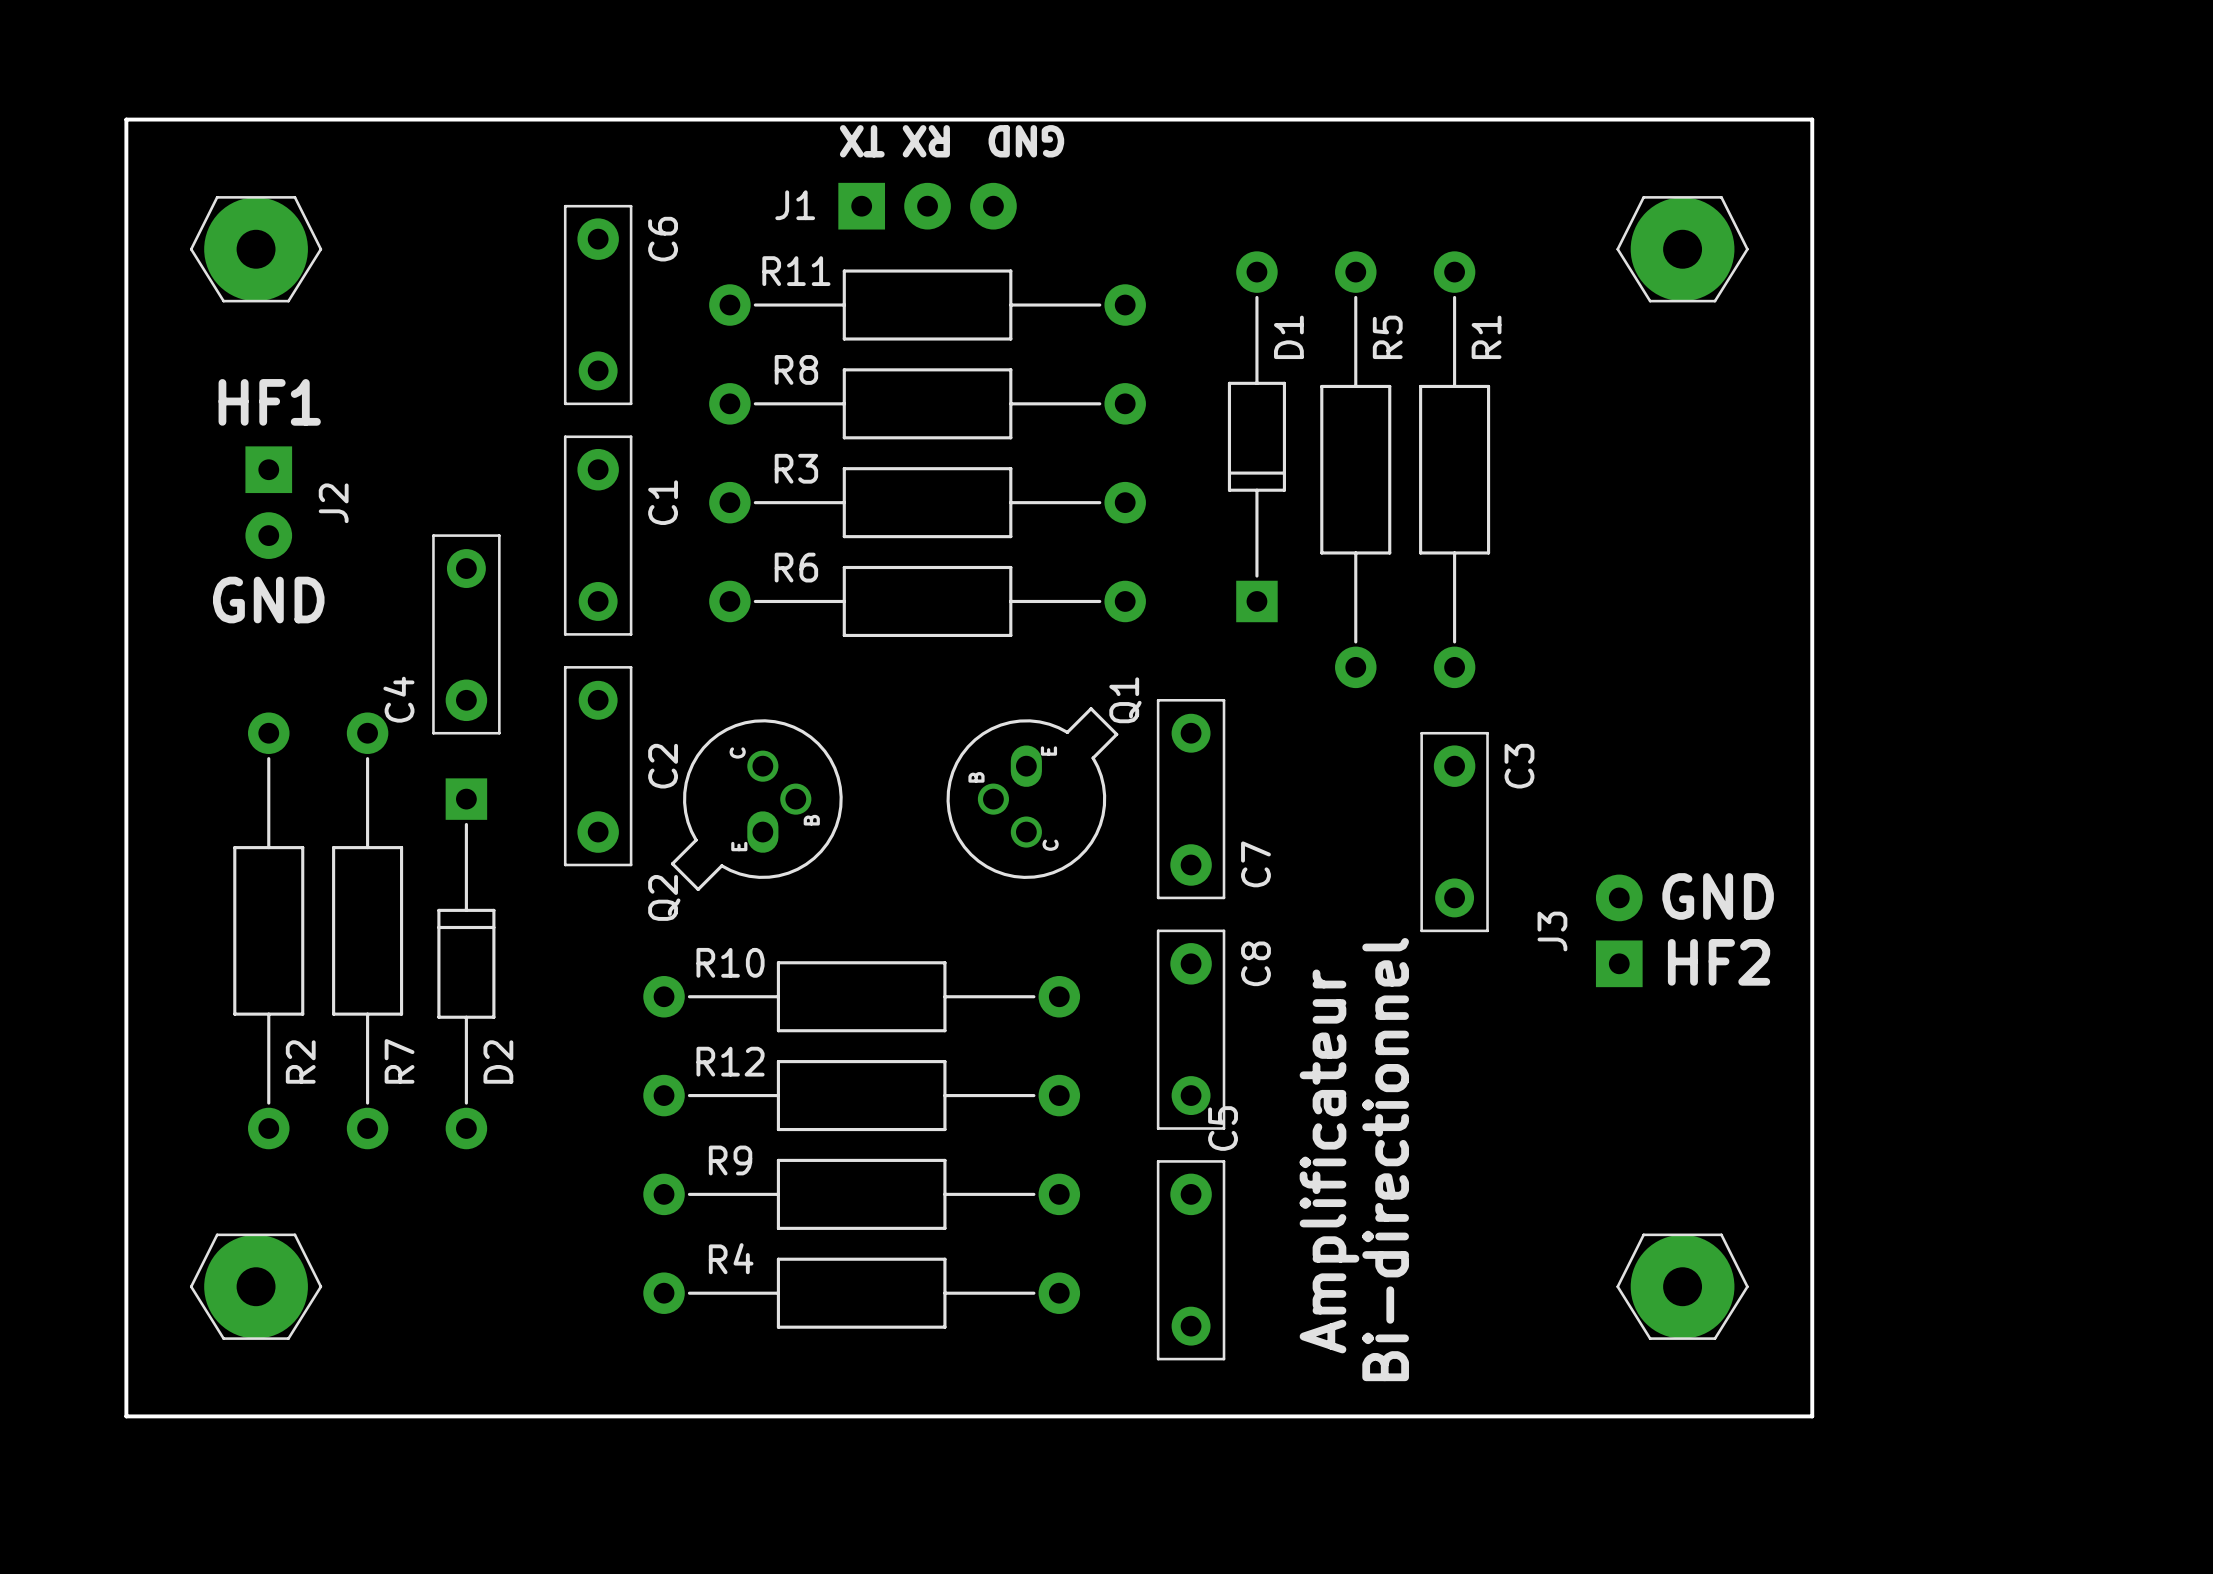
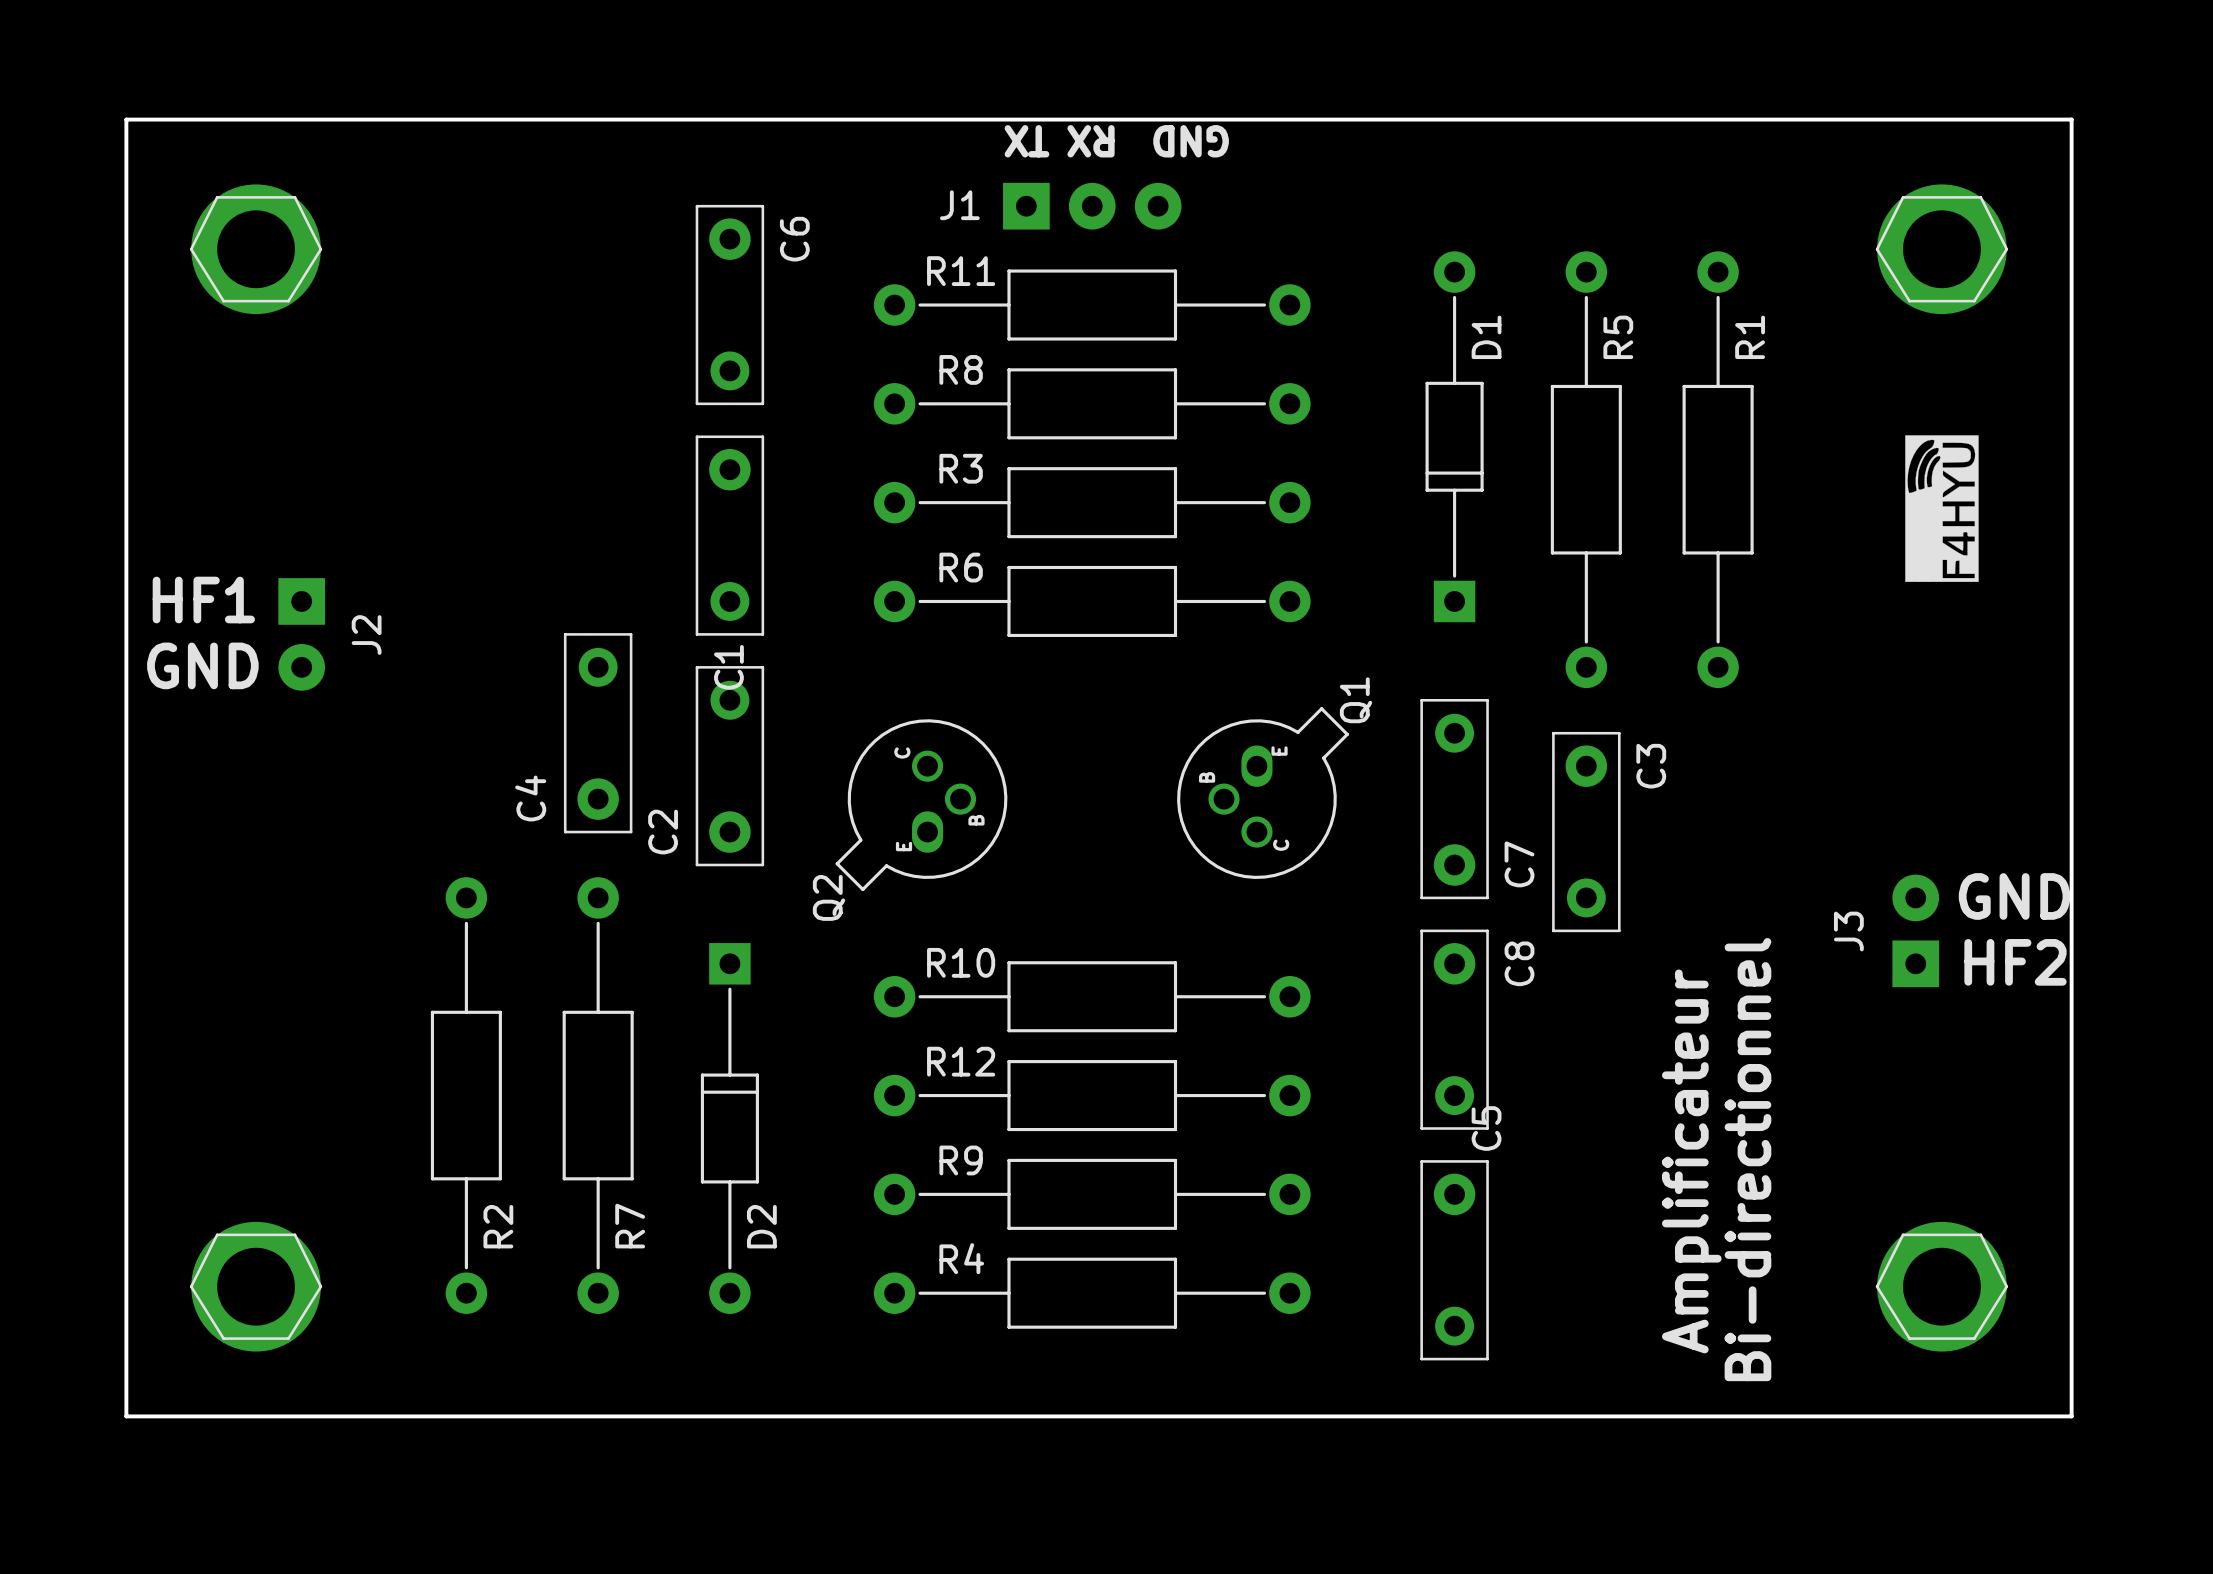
board edge: (1812, 119) (1812, 1416) -> (1812, 119) (2071, 119) (2071, 1416) (1812, 1416)
text: TX (862, 141) -> none
text position: RX (926, 141) -> RX (1091, 141)
text: GND (1026, 141) -> TX (1026, 141)
text: none -> GND (1191, 141)
part footprint: [189, 196, 323, 303] -> [189, 184, 323, 315]
J1 position: (927, 206) -> (1092, 206)
part: (1682, 249) -> none
part: none -> (1941, 249)
C6 position: (598, 305) -> (729, 305)
R11 position: (927, 305) -> (1092, 305)
text position: HF1 (269, 402) -> HF1 (203, 600)
R8 position: (927, 403) -> (1092, 403)
drawing: none -> [1905, 435, 1979, 582]
D1 position: (1256, 436) -> (1454, 436)
R5 position: (1355, 469) -> (1586, 469)
R1 position: (1454, 469) -> (1718, 469)
J2 position: (268, 502) -> (301, 634)
C1 name position: C1 (663, 502) -> C1 (728, 667)
R3 position: (927, 502) -> (1092, 502)
C1 position: (598, 535) -> (729, 535)
text position: GND (268, 600) -> GND (202, 665)
R6 position: (927, 601) -> (1092, 601)
C4 position: (466, 634) -> (598, 733)
C2 position: (598, 766) -> (729, 766)
C2 name position: C2 (663, 766) -> C2 (663, 832)
Q1 position: (1032, 793) -> (1262, 793)
C7 position: (1191, 799) -> (1454, 799)
Q2 position: (756, 805) -> (921, 805)
C3 position: (1454, 832) -> (1586, 832)
text position: GND (1718, 896) -> GND (2014, 896)
R2 position: (268, 930) -> (466, 1095)
R7 position: (367, 930) -> (598, 1095)
J3 position: (1619, 930) -> (1915, 930)
text position: HF2 (1719, 962) -> HF2 (2015, 962)
D2 position: (466, 963) -> (729, 1128)
R10 position: (861, 996) -> (1092, 996)
C8 position: (1191, 1029) -> (1454, 1029)
R12 position: (861, 1095) -> (1092, 1095)
text position: Bi-directionnel (1385, 1159) -> Bi-directionnel (1747, 1159)
text position: Amplificateur (1329, 1161) -> Amplificateur (1691, 1161)
R9 position: (861, 1194) -> (1092, 1194)
part footprint: [189, 1233, 323, 1340] -> [189, 1221, 323, 1352]
C5 position: (1191, 1260) -> (1454, 1260)
part: (1682, 1286) -> none
part: none -> (1941, 1286)
R4 position: (861, 1293) -> (1092, 1293)

